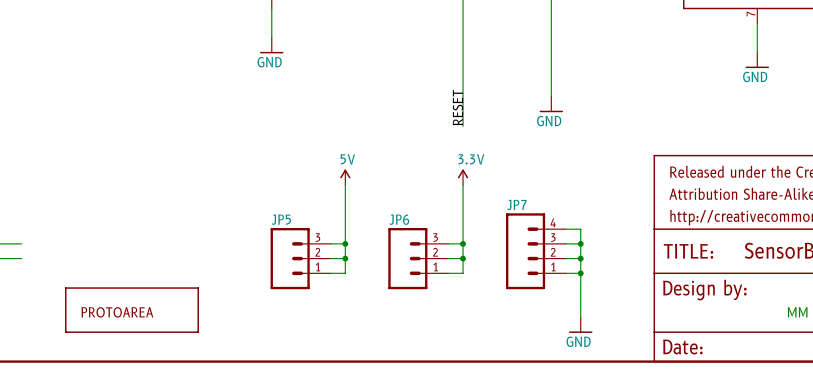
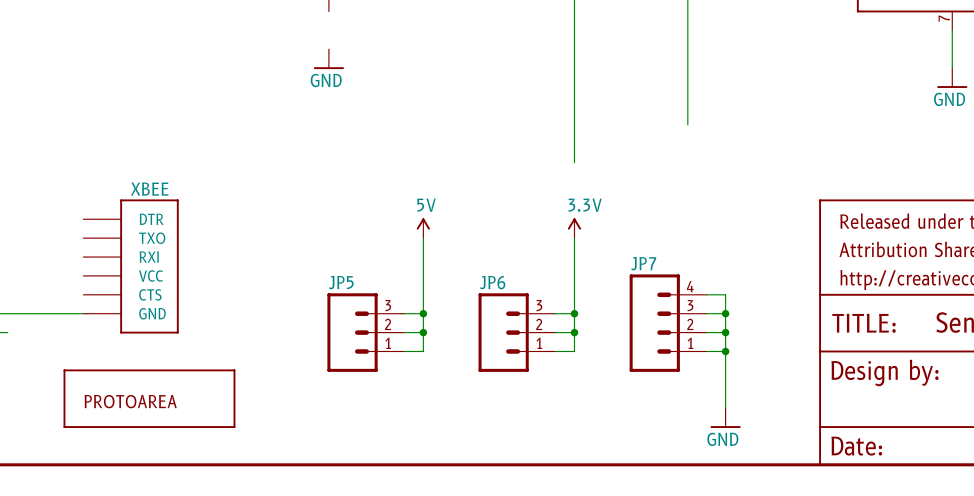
wire: (271, 8) (271, 37) -> none
power symbol: GND (551, 104) -> none
label: RESET (457, 107) -> none
XBEE: none -> (131, 266)
wire: none -> (7, 313) (83, 313)

